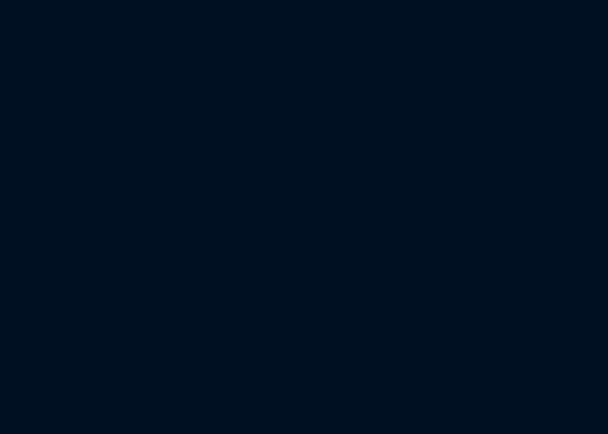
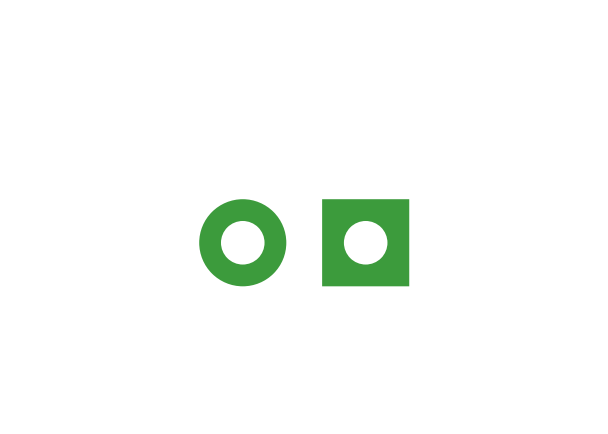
part: none -> (304, 242)

